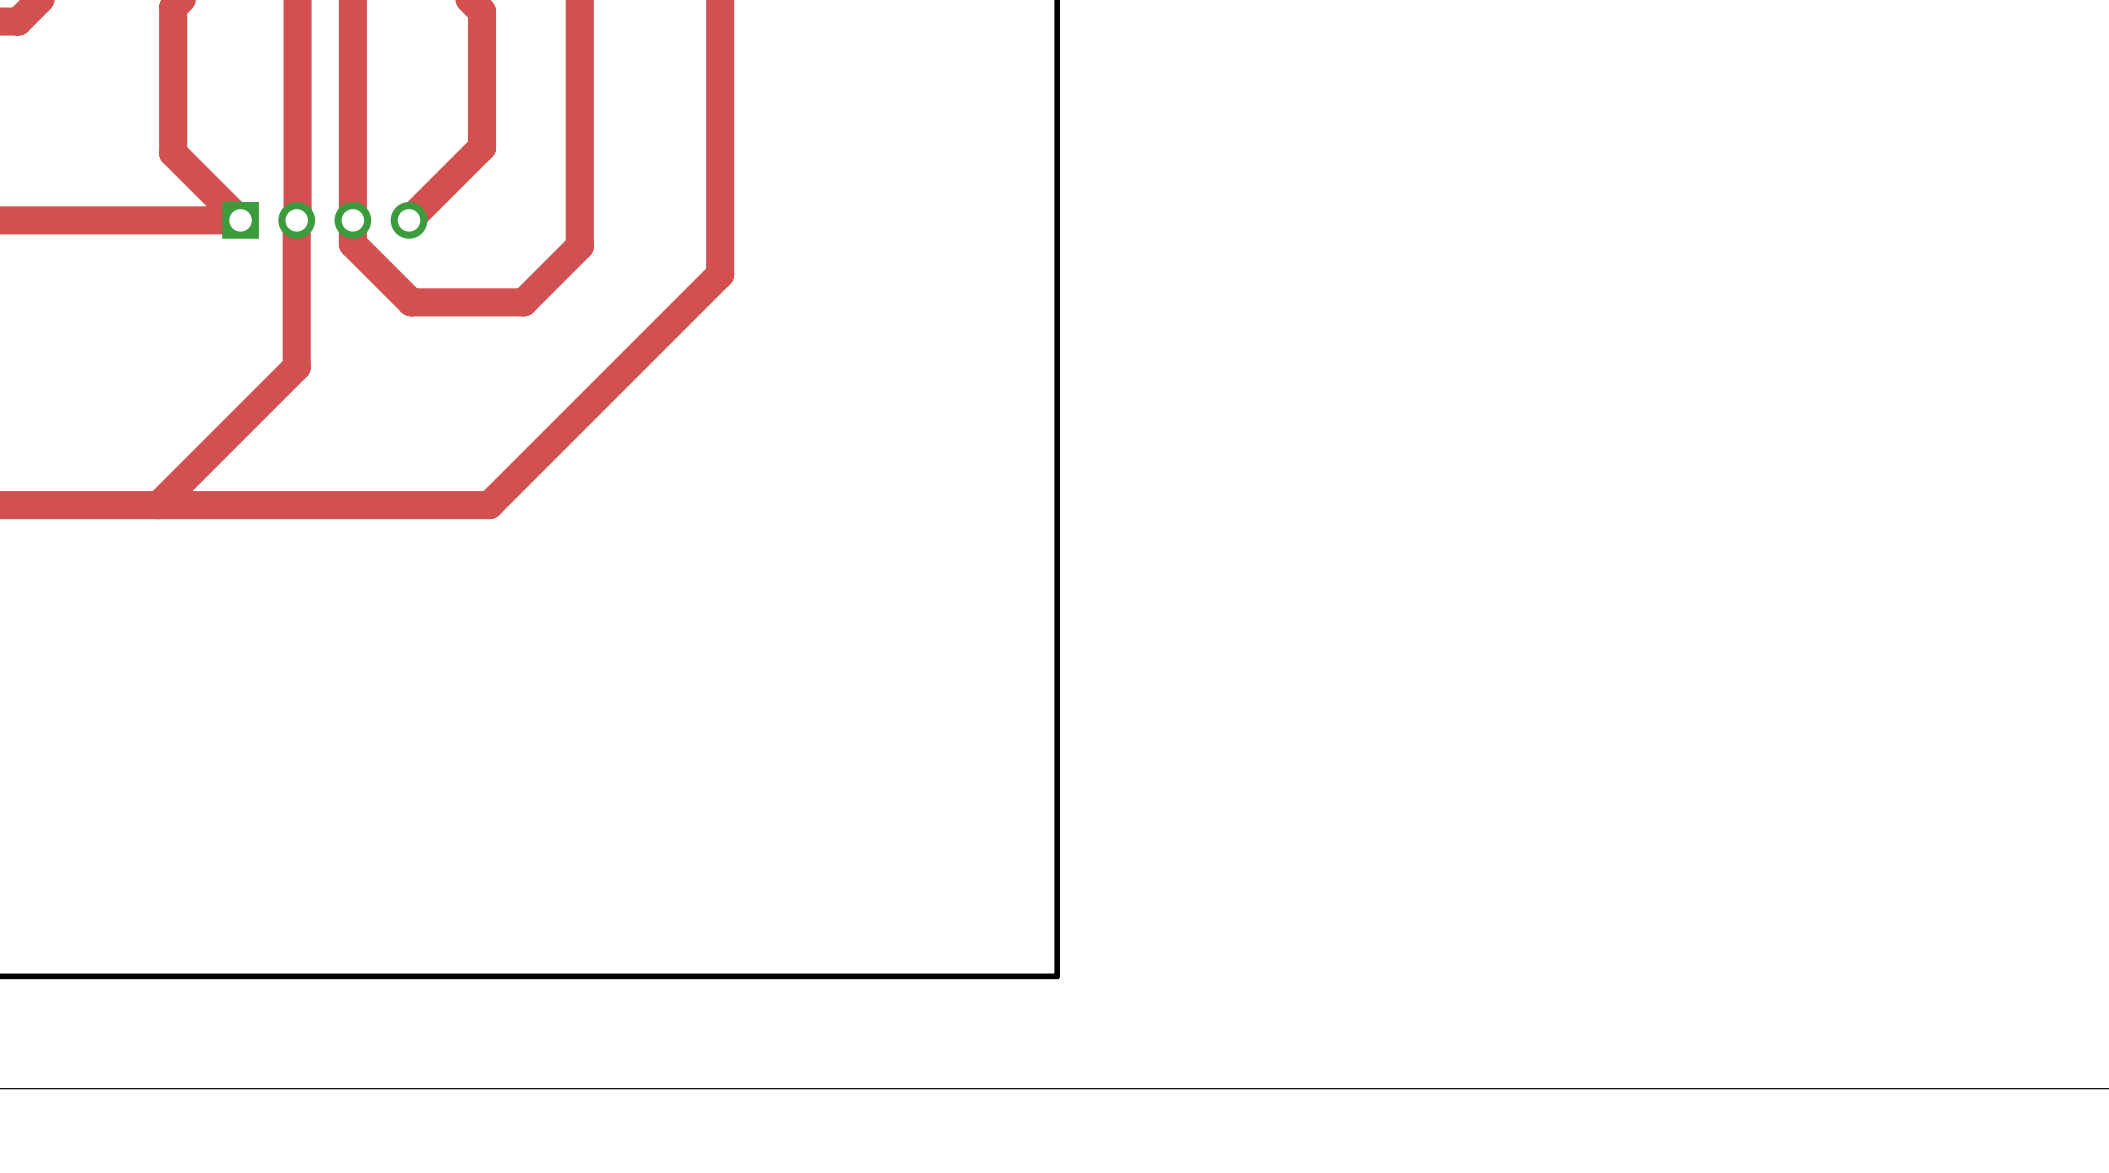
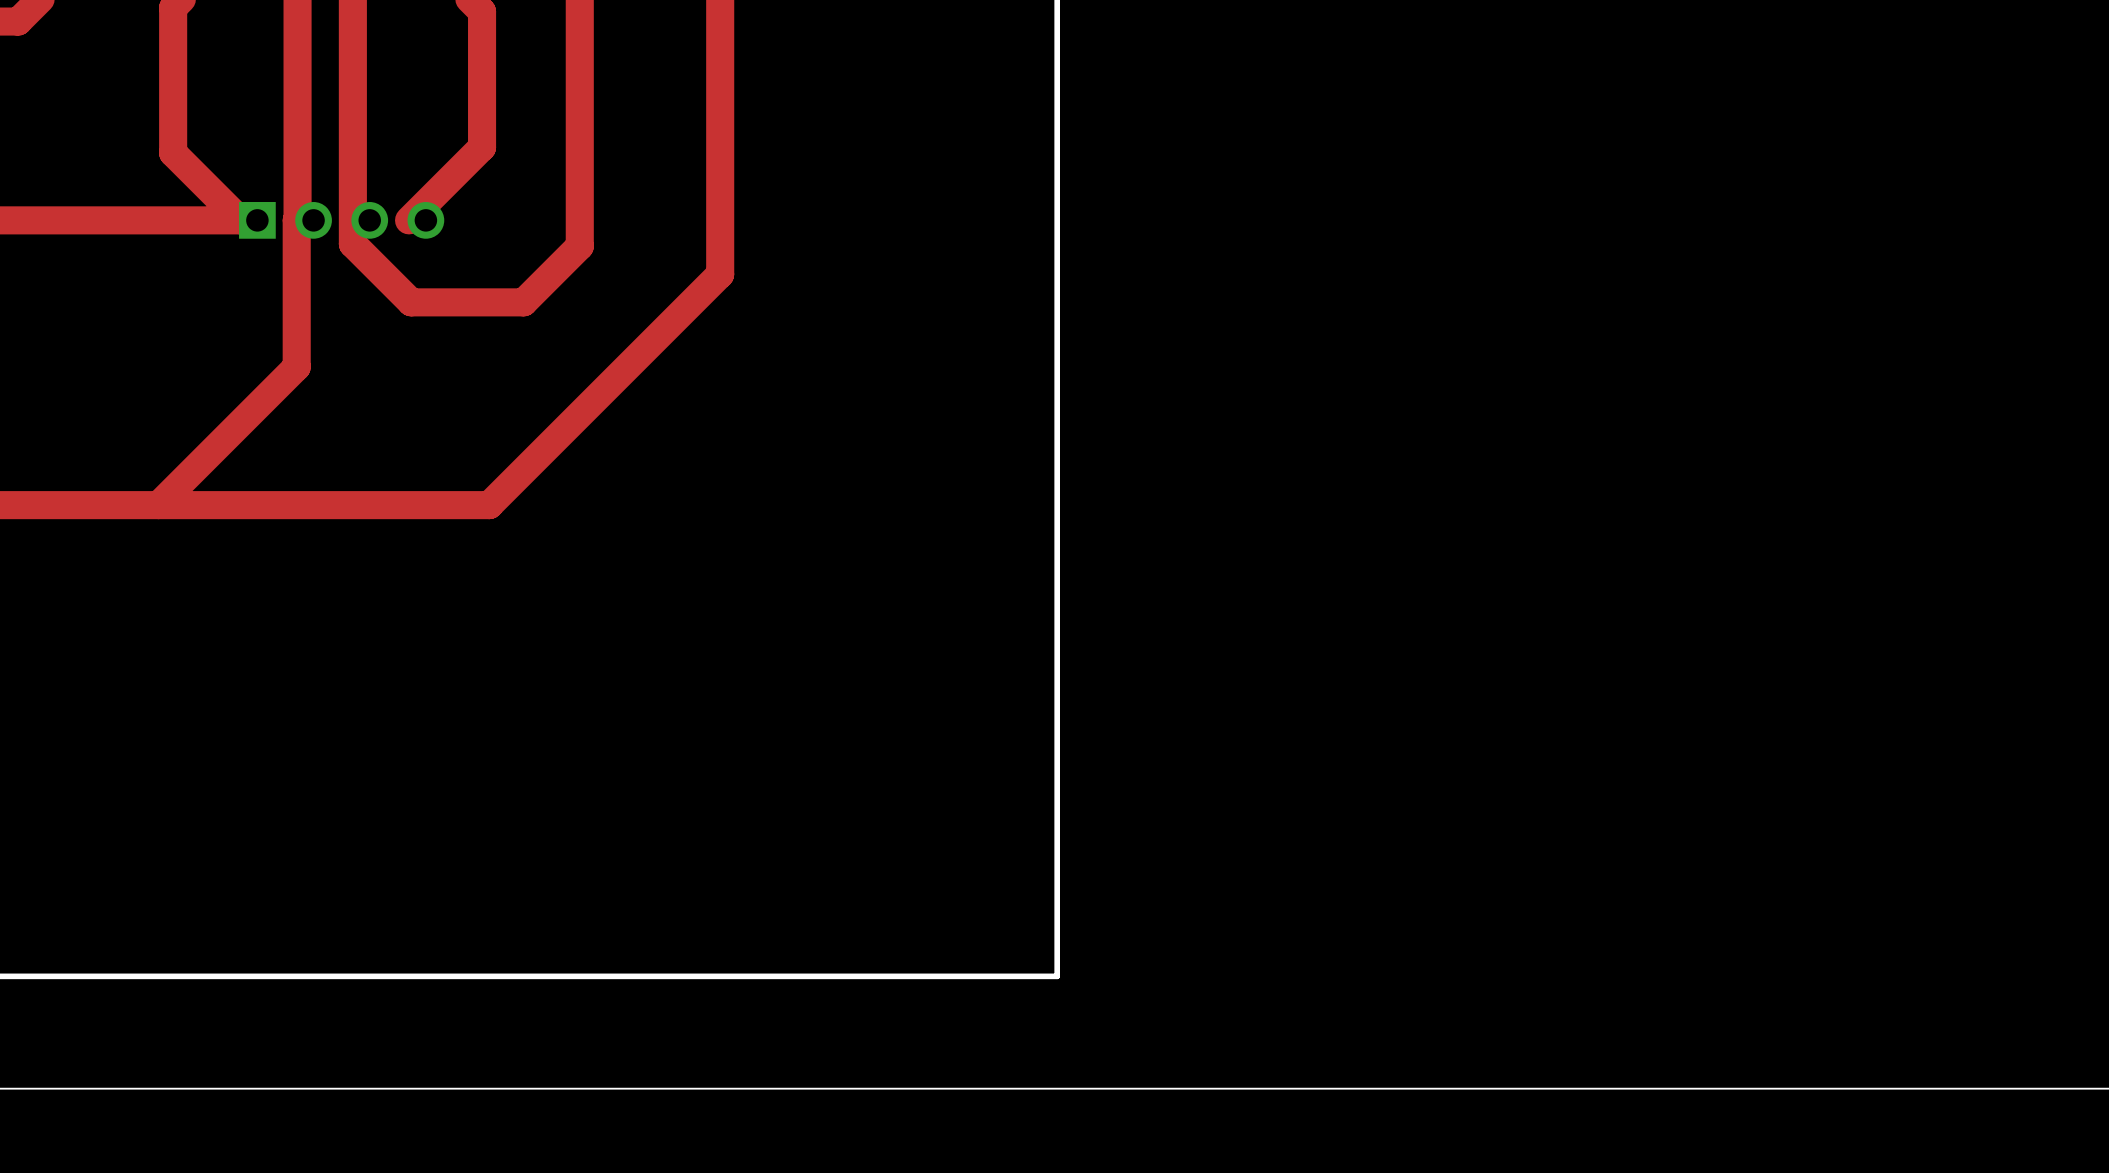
part position: (324, 220) -> (341, 220)

